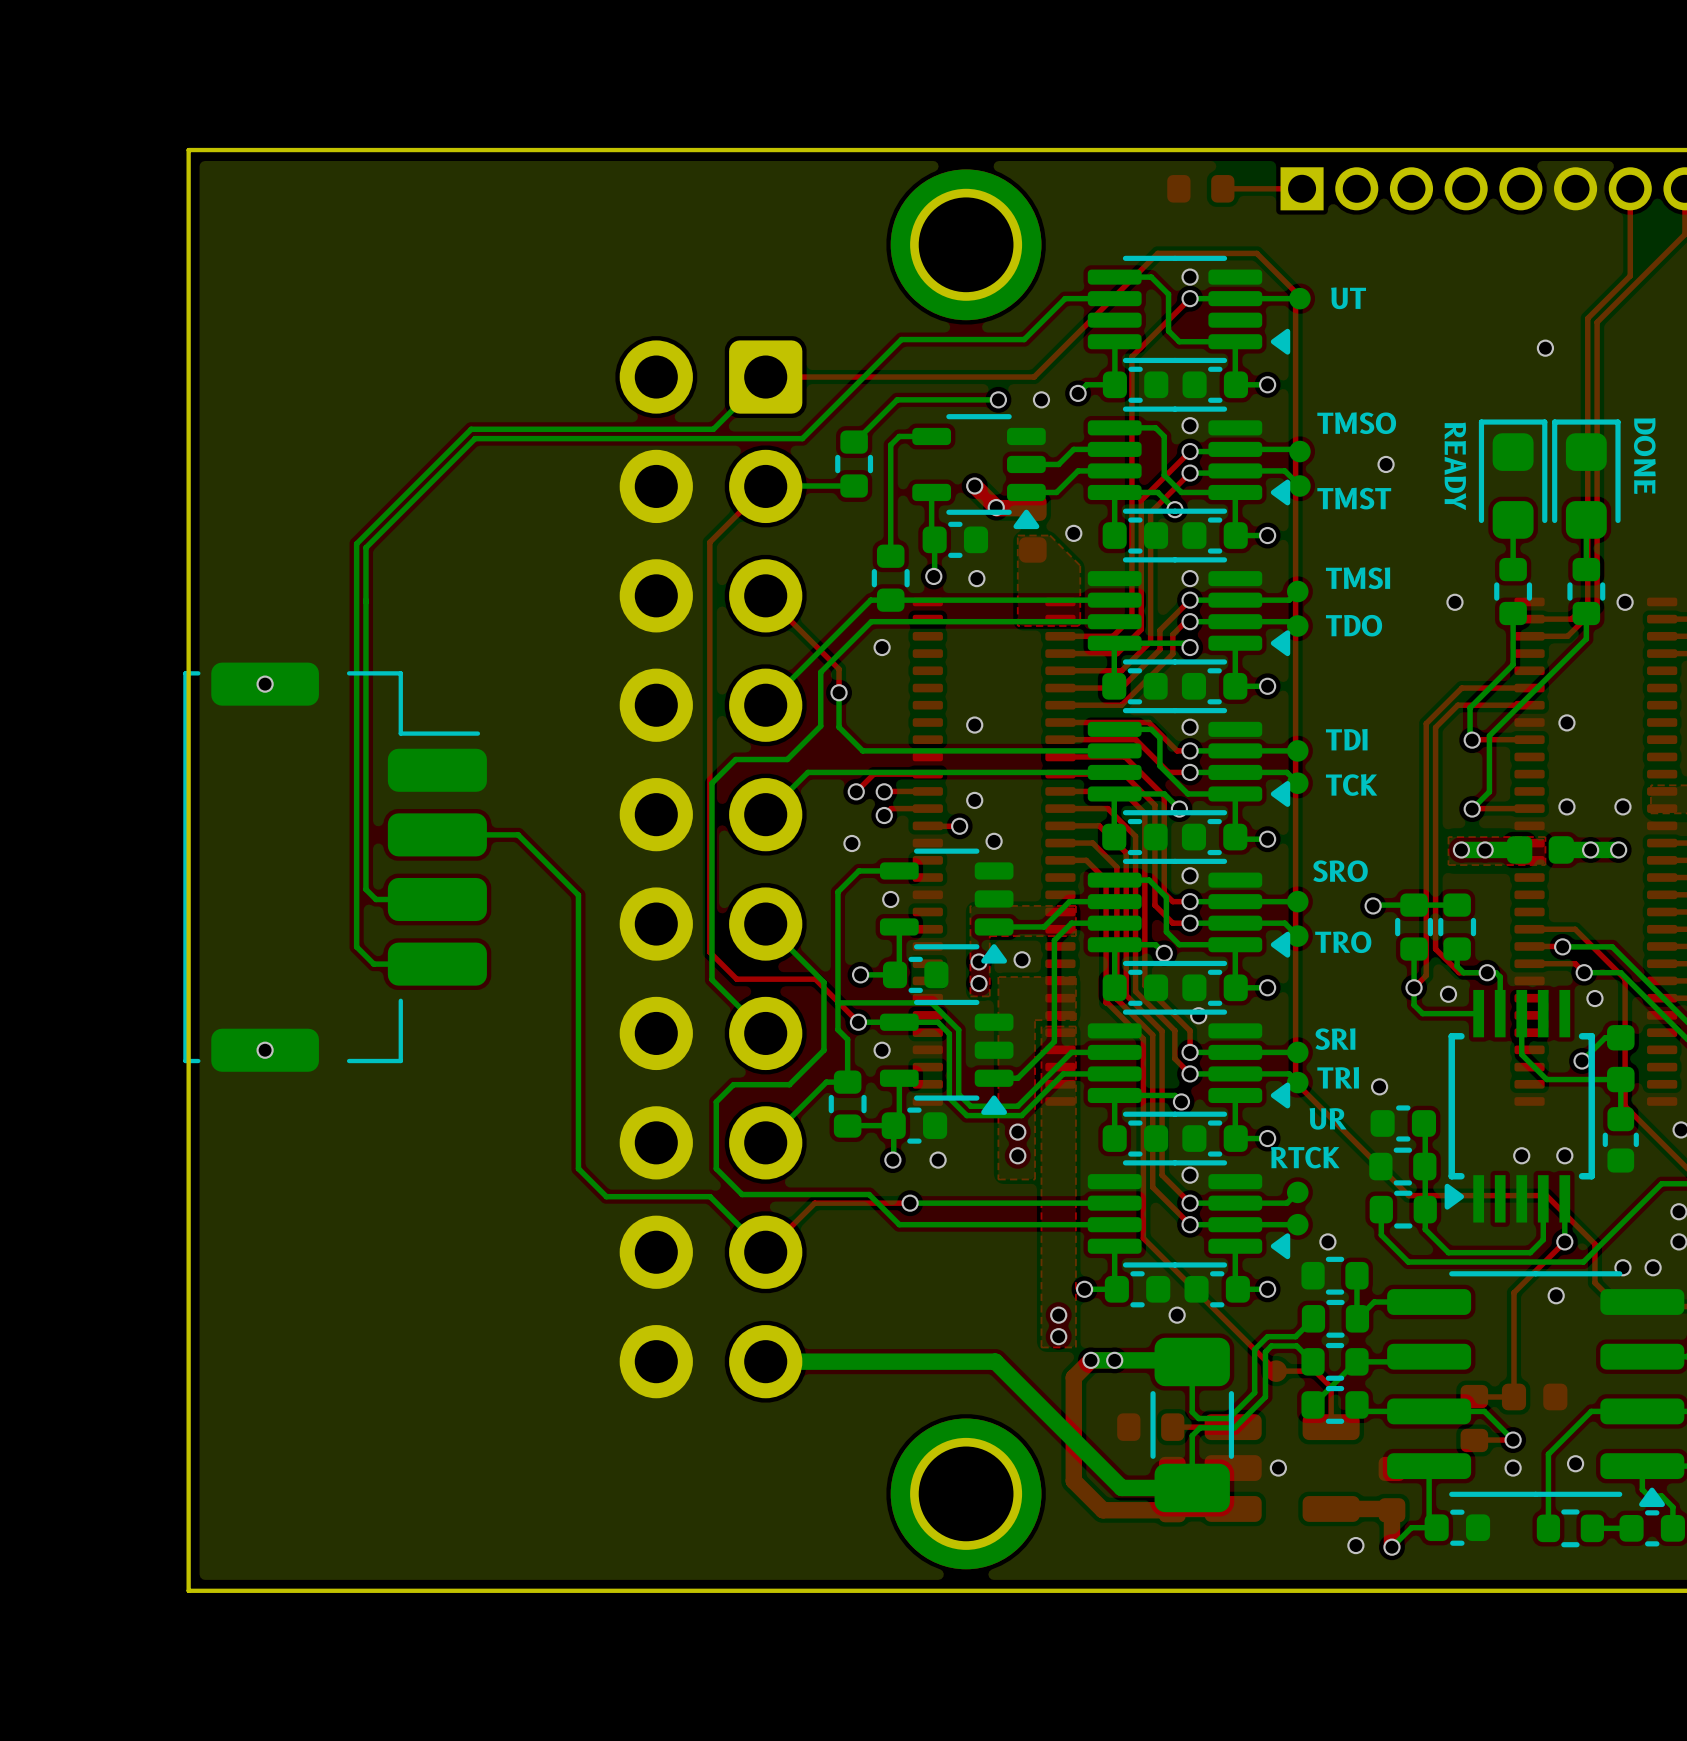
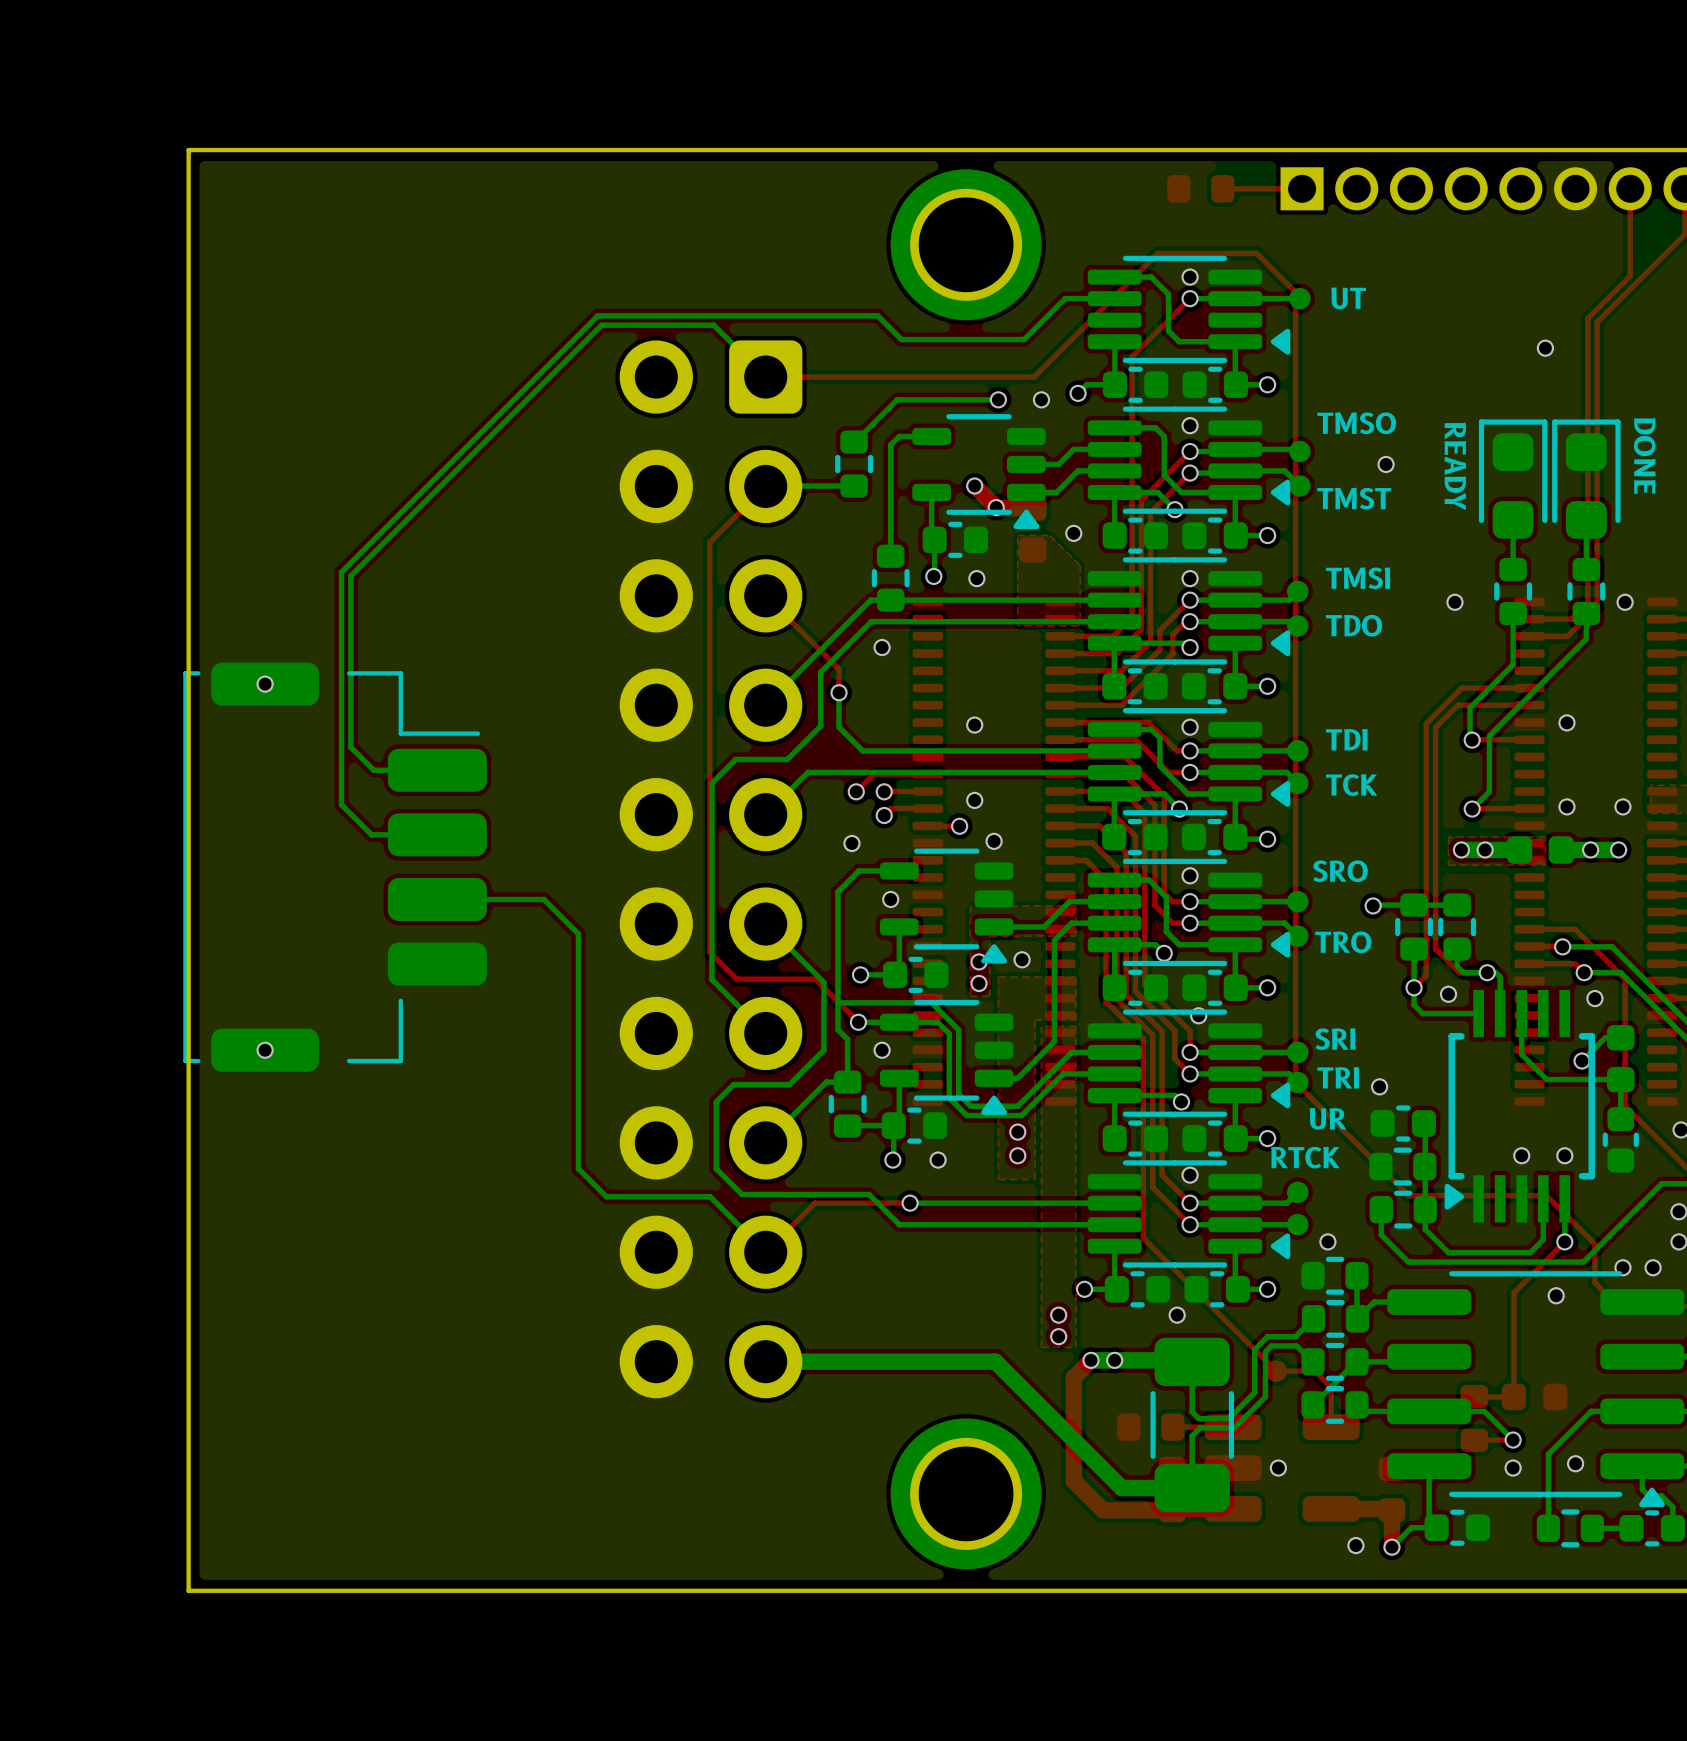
bottom track: (901, 339) (802, 438) (475, 438) -> (901, 339) (877, 315) (597, 315) (475, 438)
bottom track: (765, 377) (713, 429) (471, 429) (356, 543) (356, 946) (373, 964) (437, 964) -> (765, 377) (713, 325) (601, 325) (350, 576) (350, 747) (373, 770) (437, 770)
bottom track: (365, 547) (365, 889) (376, 899) (437, 899) -> (365, 547) (341, 572) (341, 804) (371, 834) (437, 834)
bottom track: (437, 834) (518, 834) (578, 895) (578, 933) -> (437, 899) (543, 899) (578, 933)

